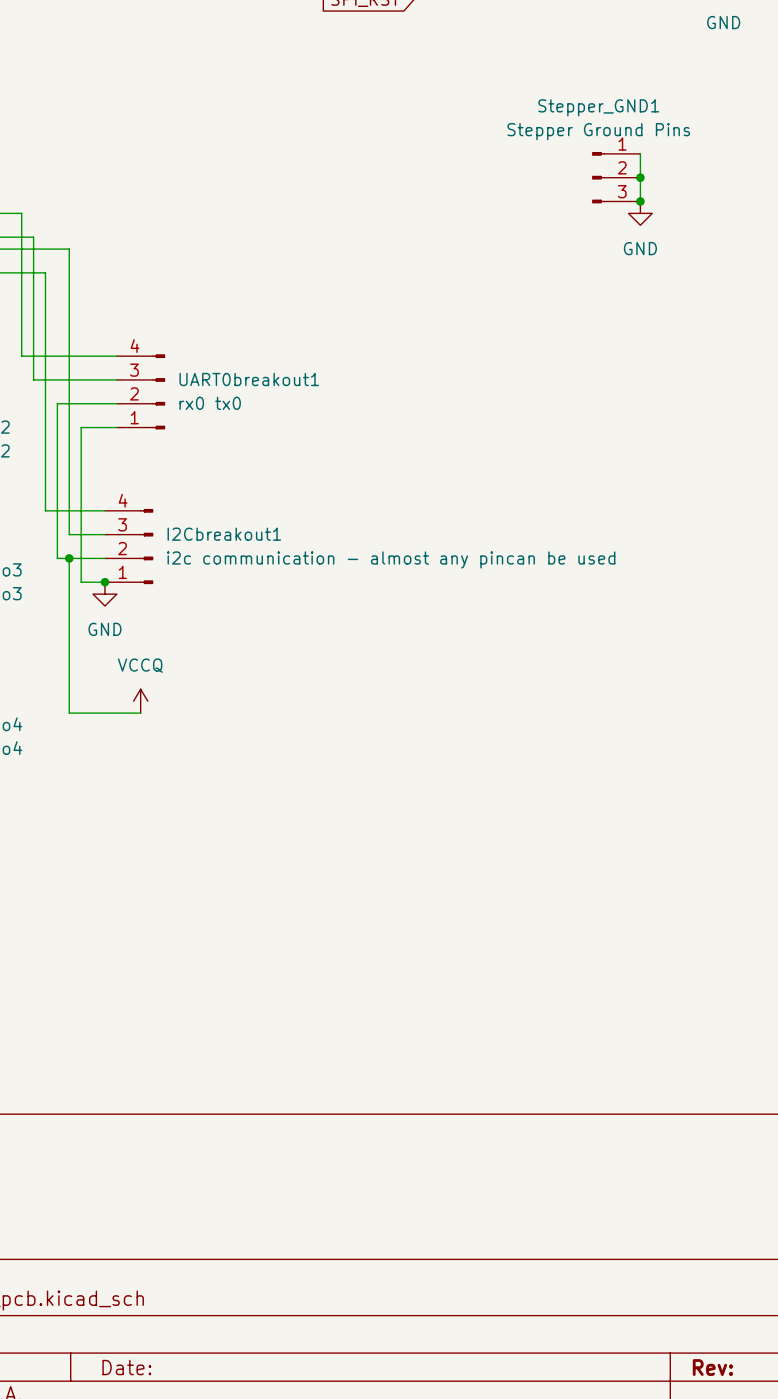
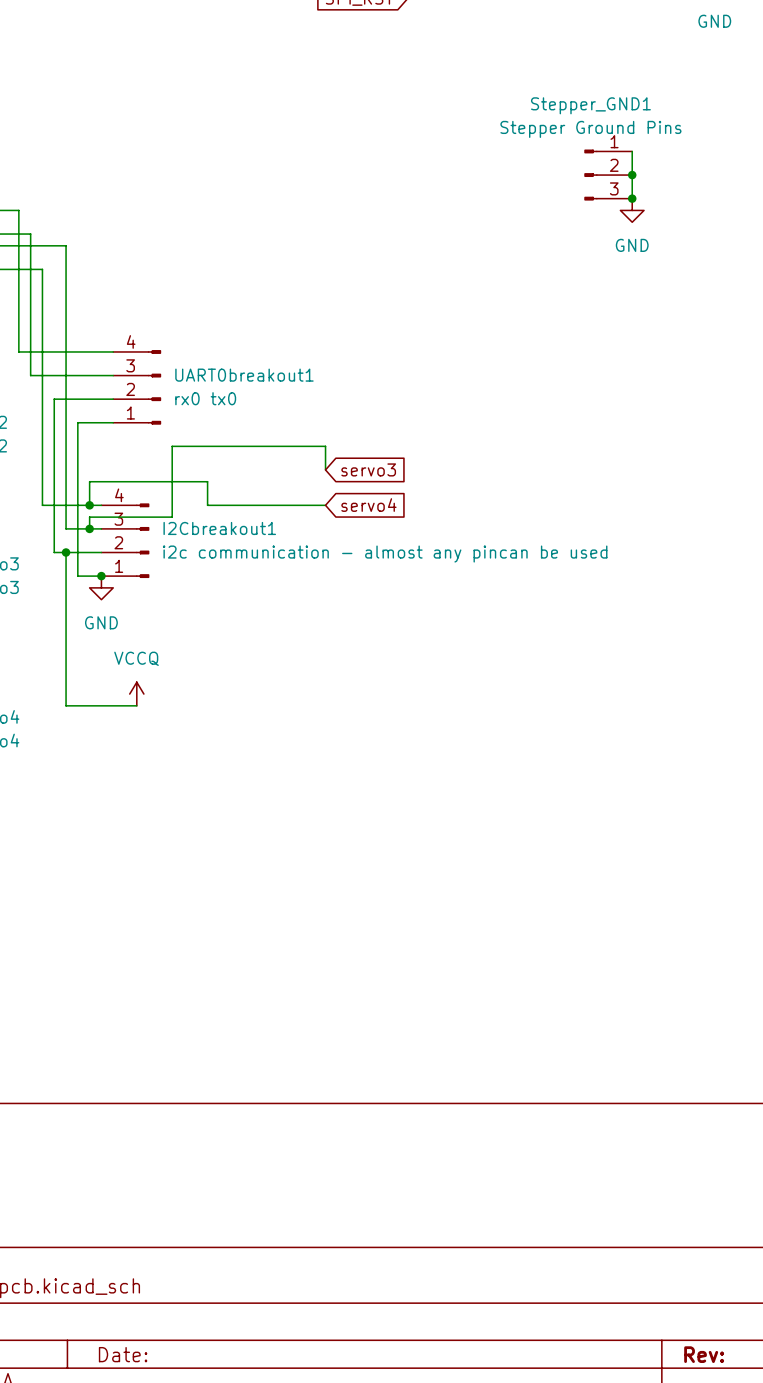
wire: none -> (325, 469) (325, 446) (172, 446) (172, 517) (89, 517) (89, 528)
global label: none -> servo3 (368, 469)
wire: none -> (89, 505) (89, 481) (207, 481) (207, 505) (325, 505)
junction: none -> (89, 505)
global label: none -> servo4 (368, 505)
junction: none -> (89, 528)

